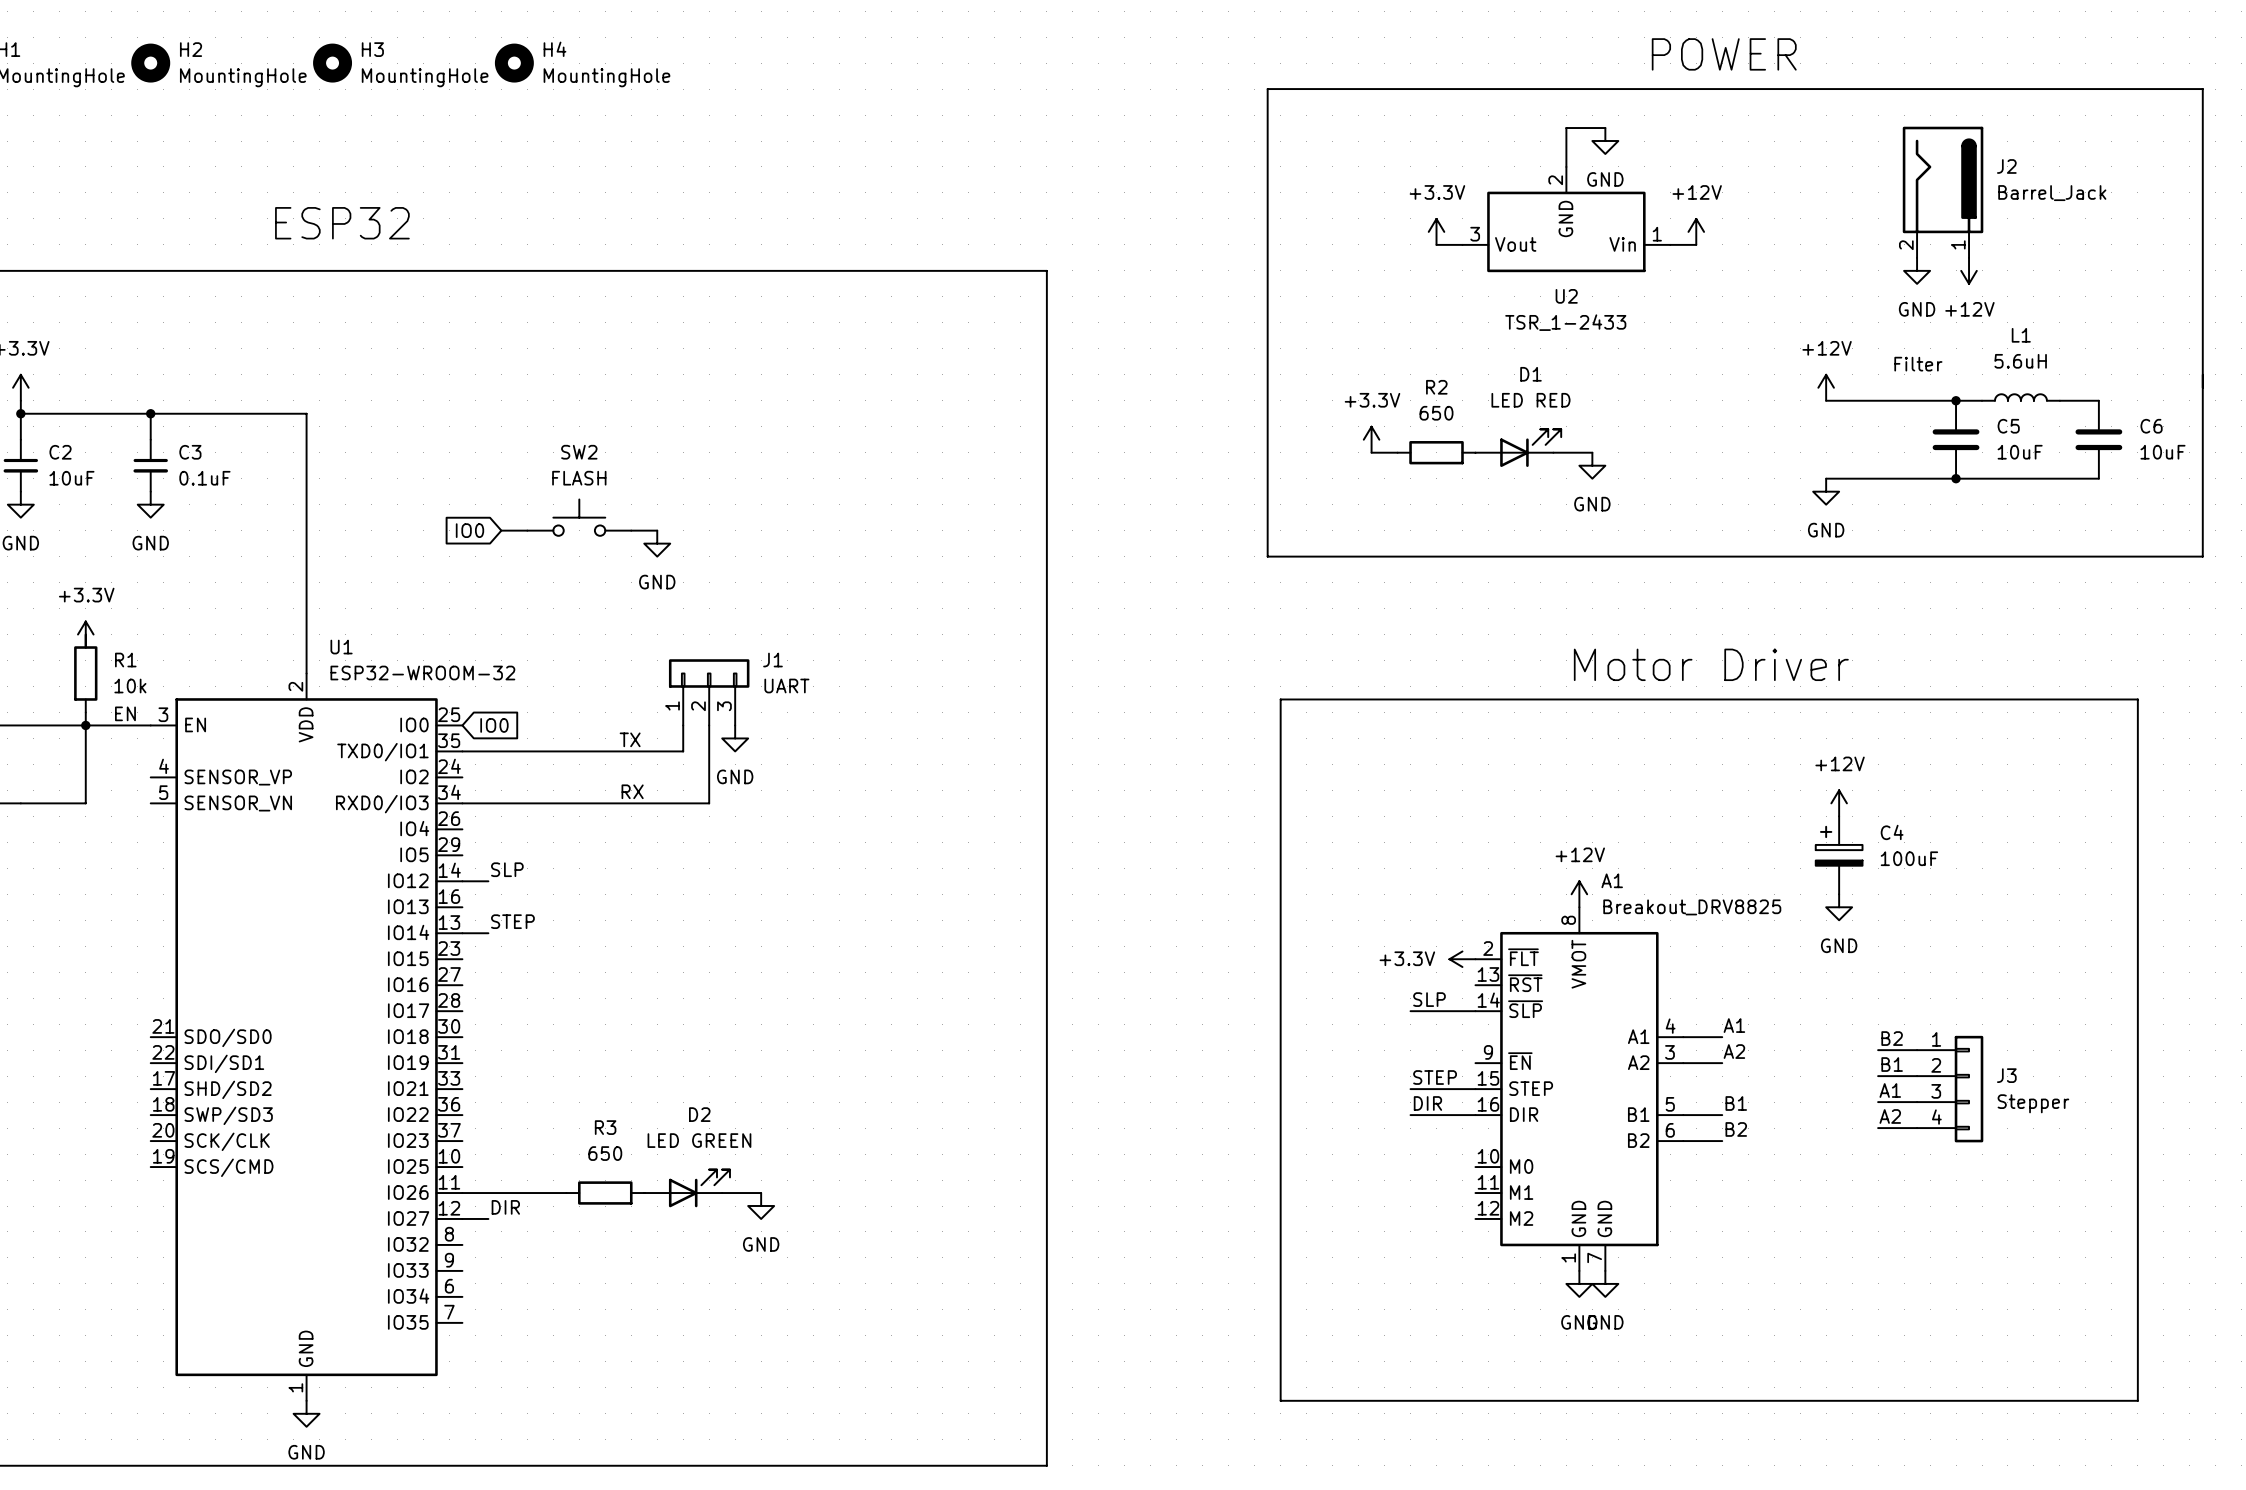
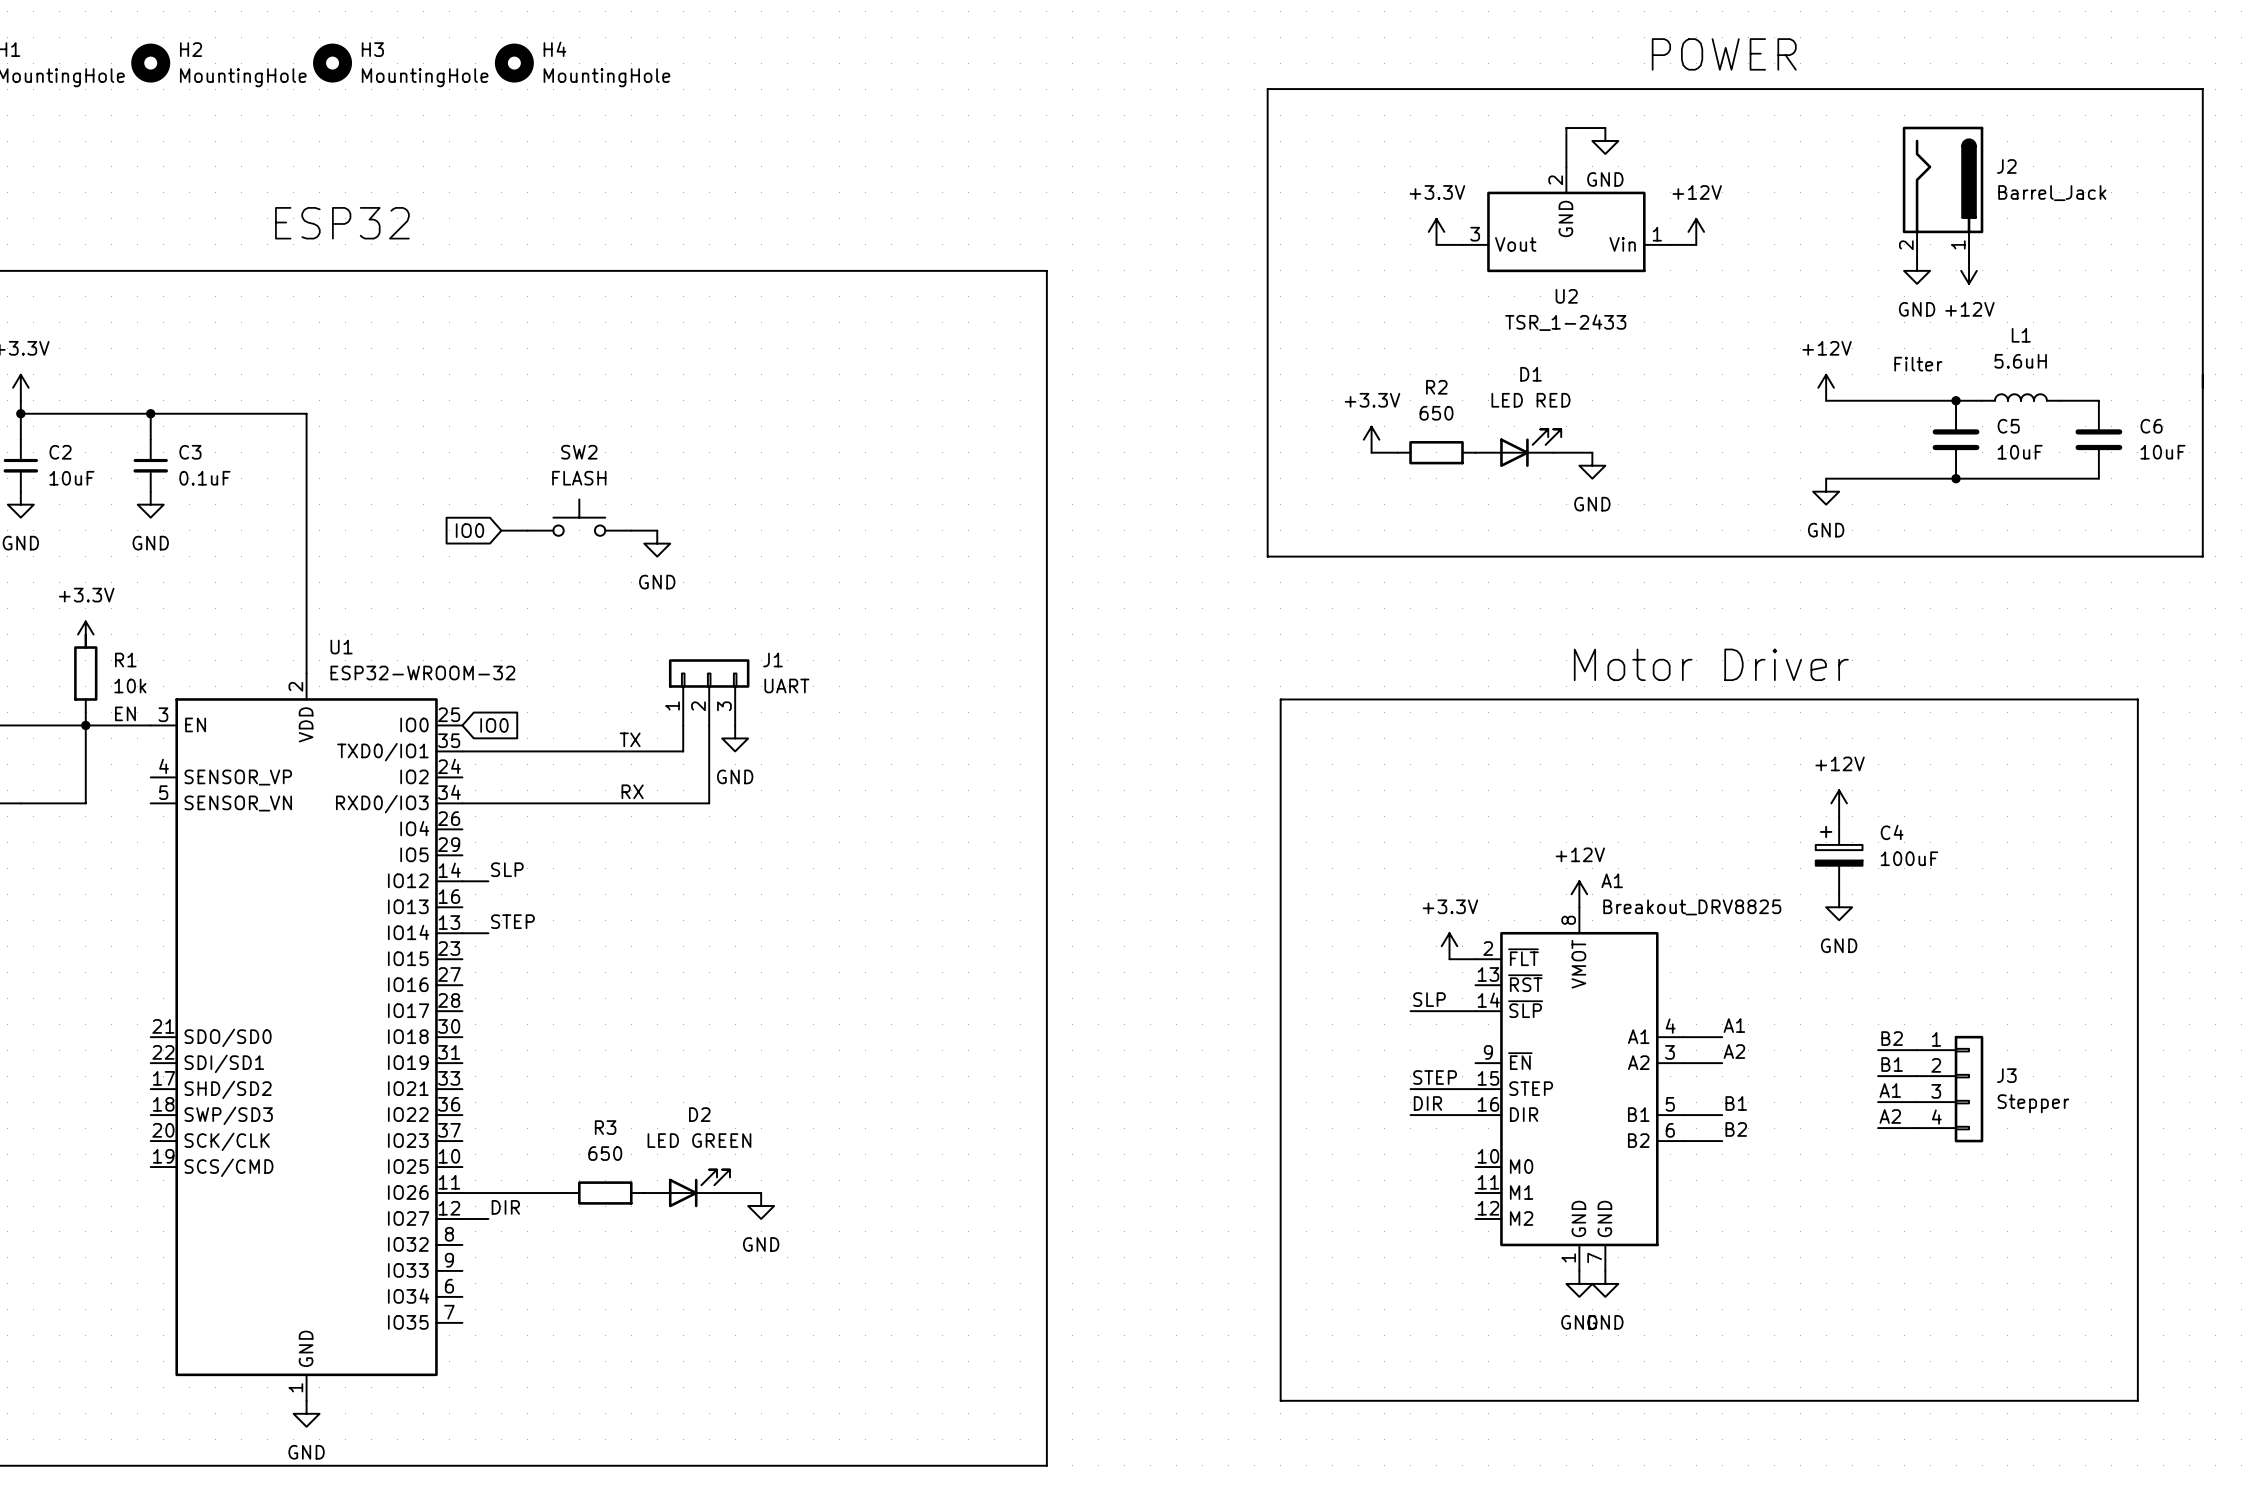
power symbol text position: +3.3V (1407, 958) -> +3.3V (1450, 906)
power symbol rotation: 0° (1462, 959) -> 90° clockwise (1449, 946)
power symbol position: +3.3V (1462, 959) -> +3.3V (1449, 946)

